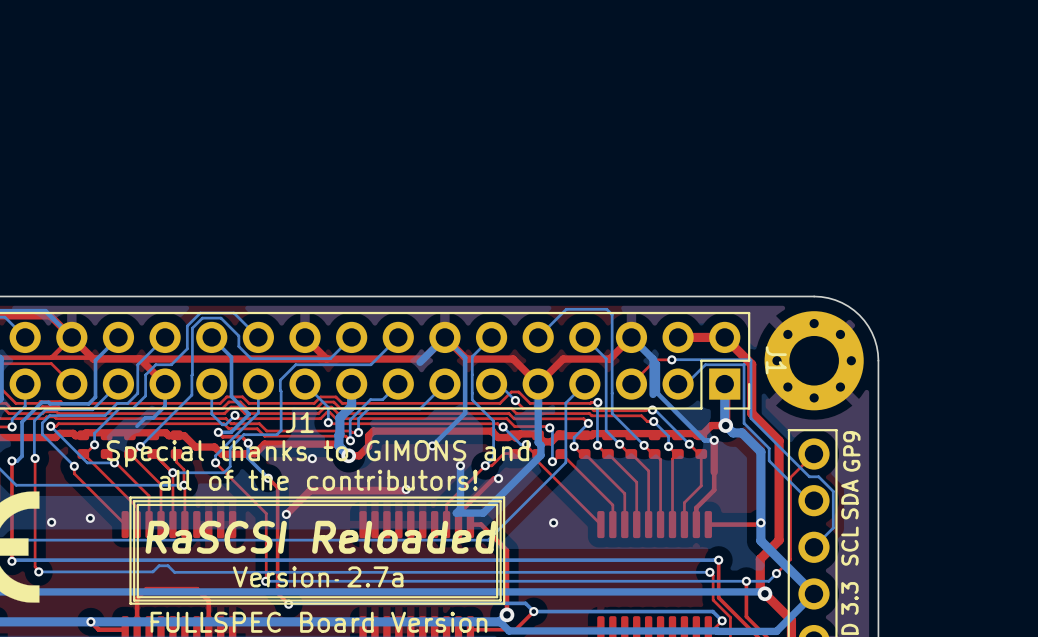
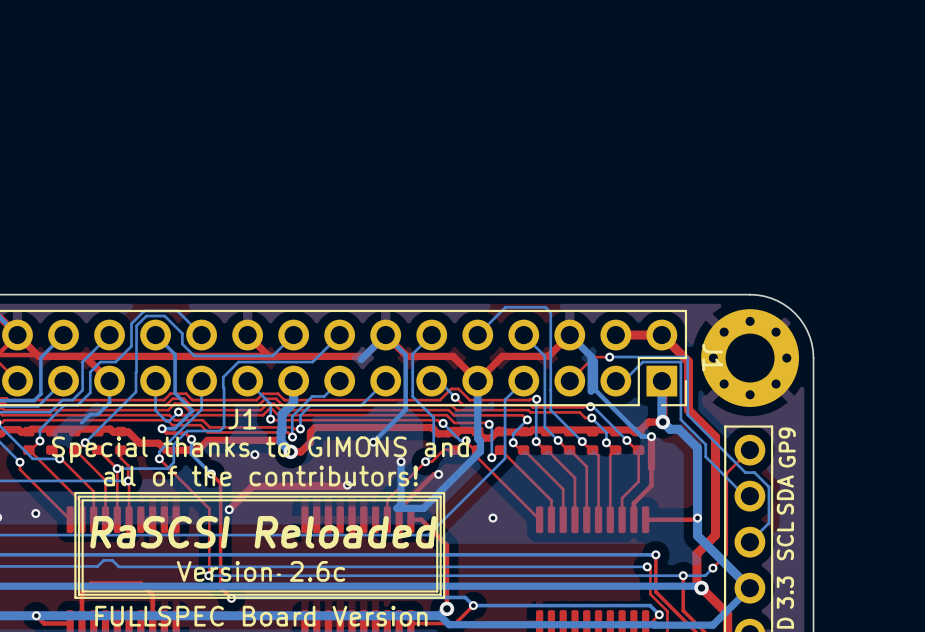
text: Version 2.7a (318, 576) -> Version 2.6c (260, 571)

